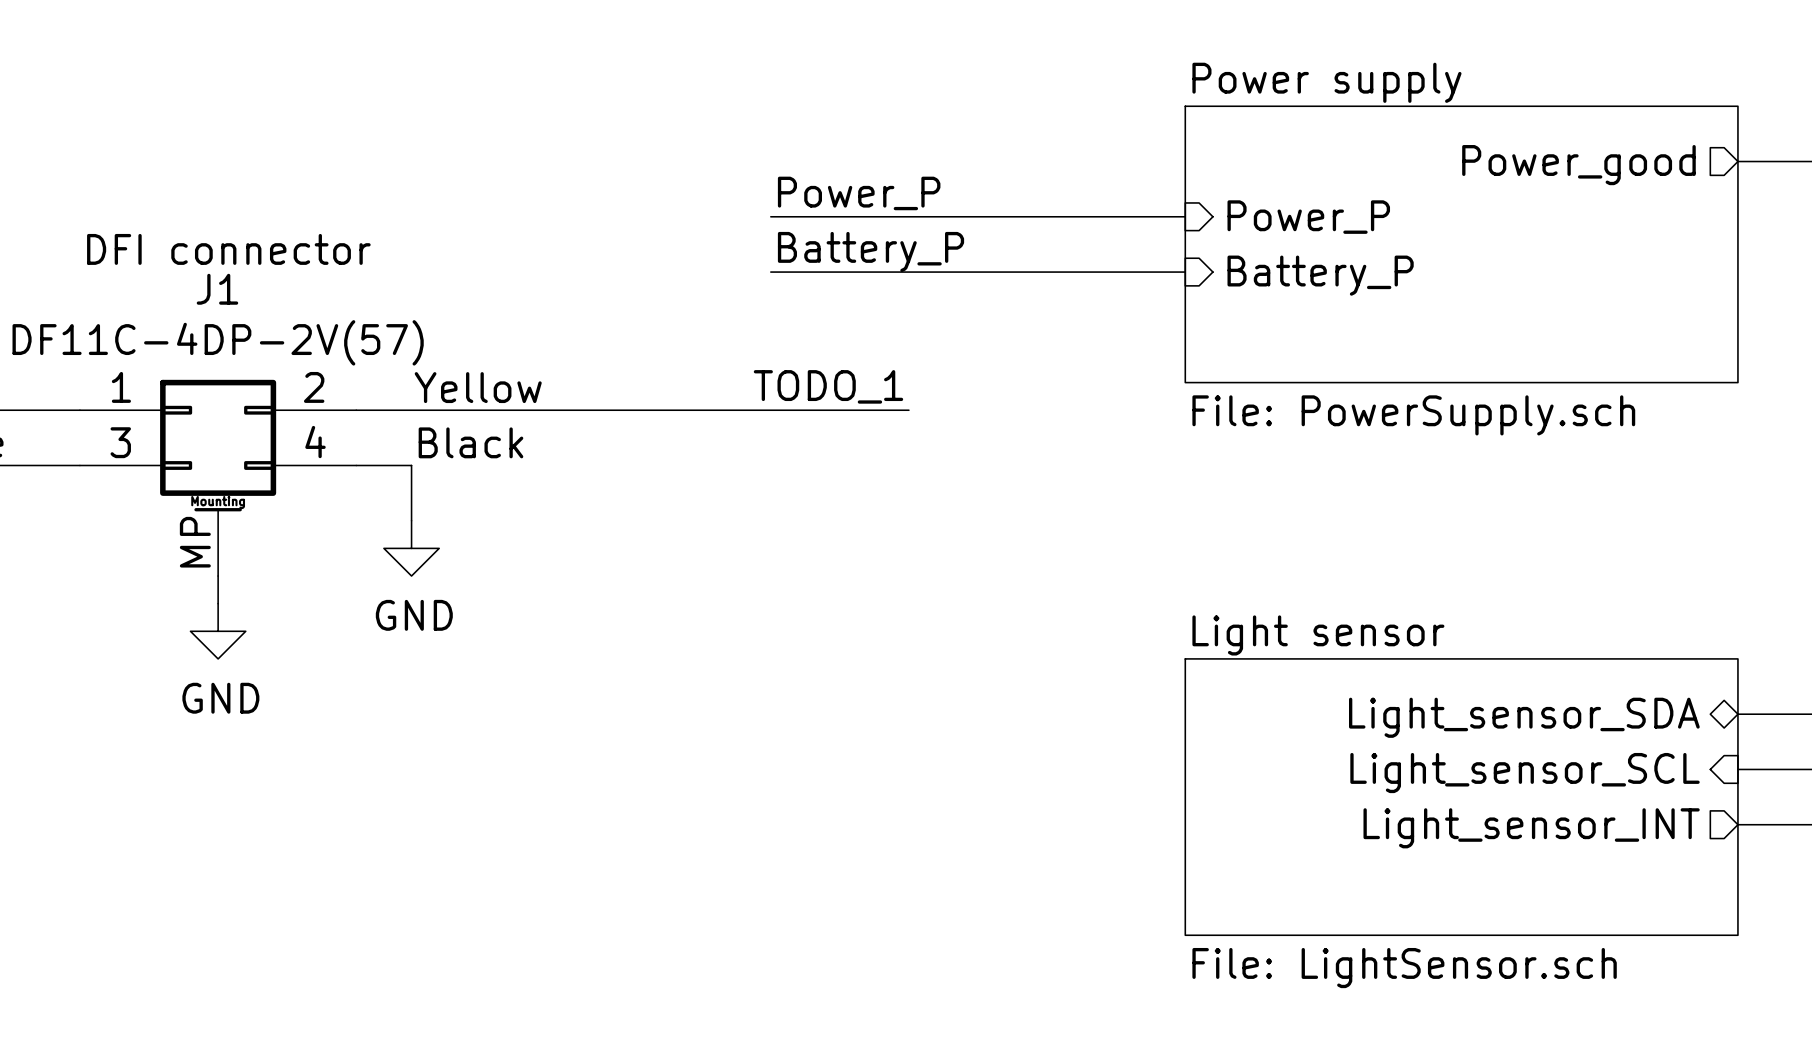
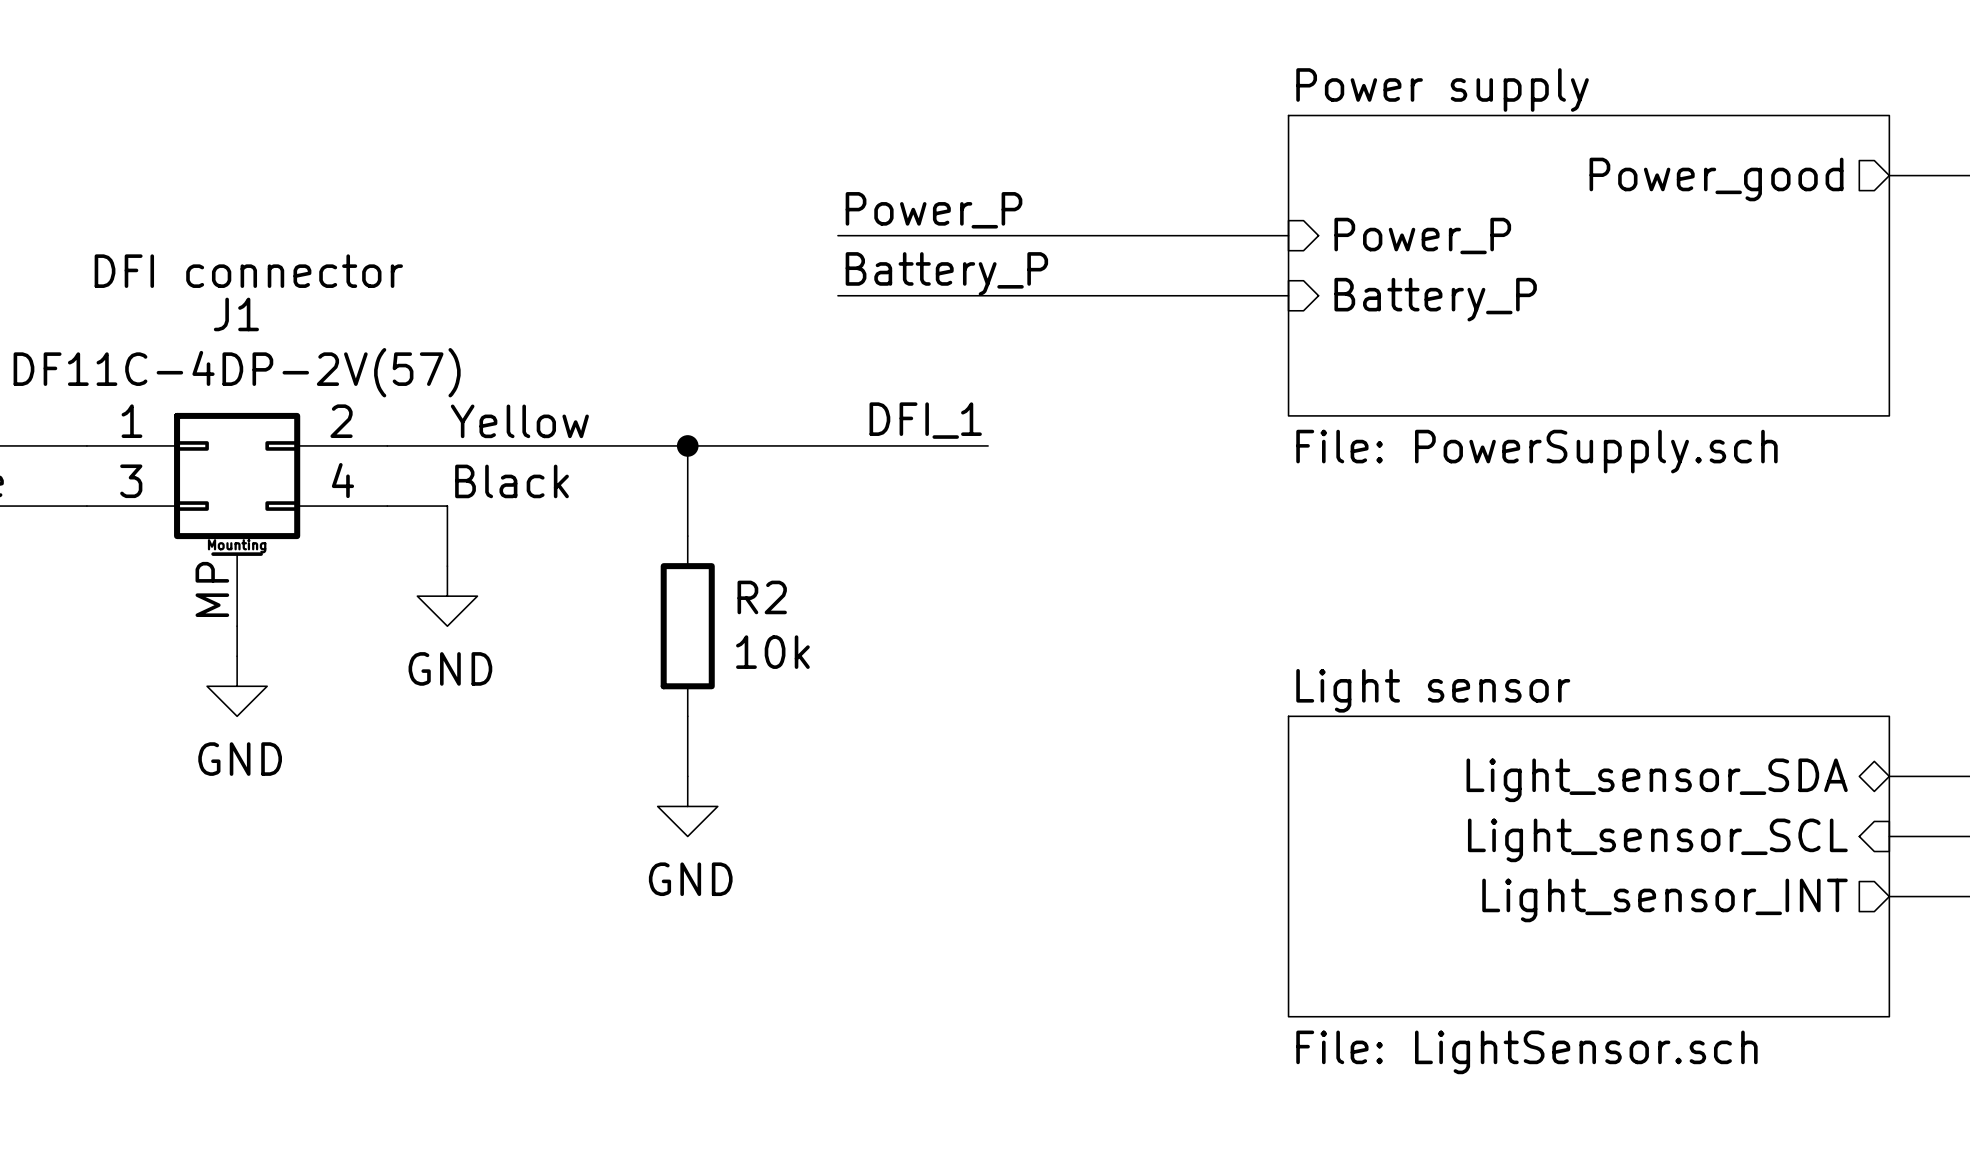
label: TODO_1 (828, 386) -> DFI_1 (925, 420)
wire: none -> (687, 445) (687, 536)
junction: none -> (687, 445)
R2: none -> 10k (687, 626)
wire: none -> (687, 716) (687, 776)
power symbol: none -> GND (687, 806)

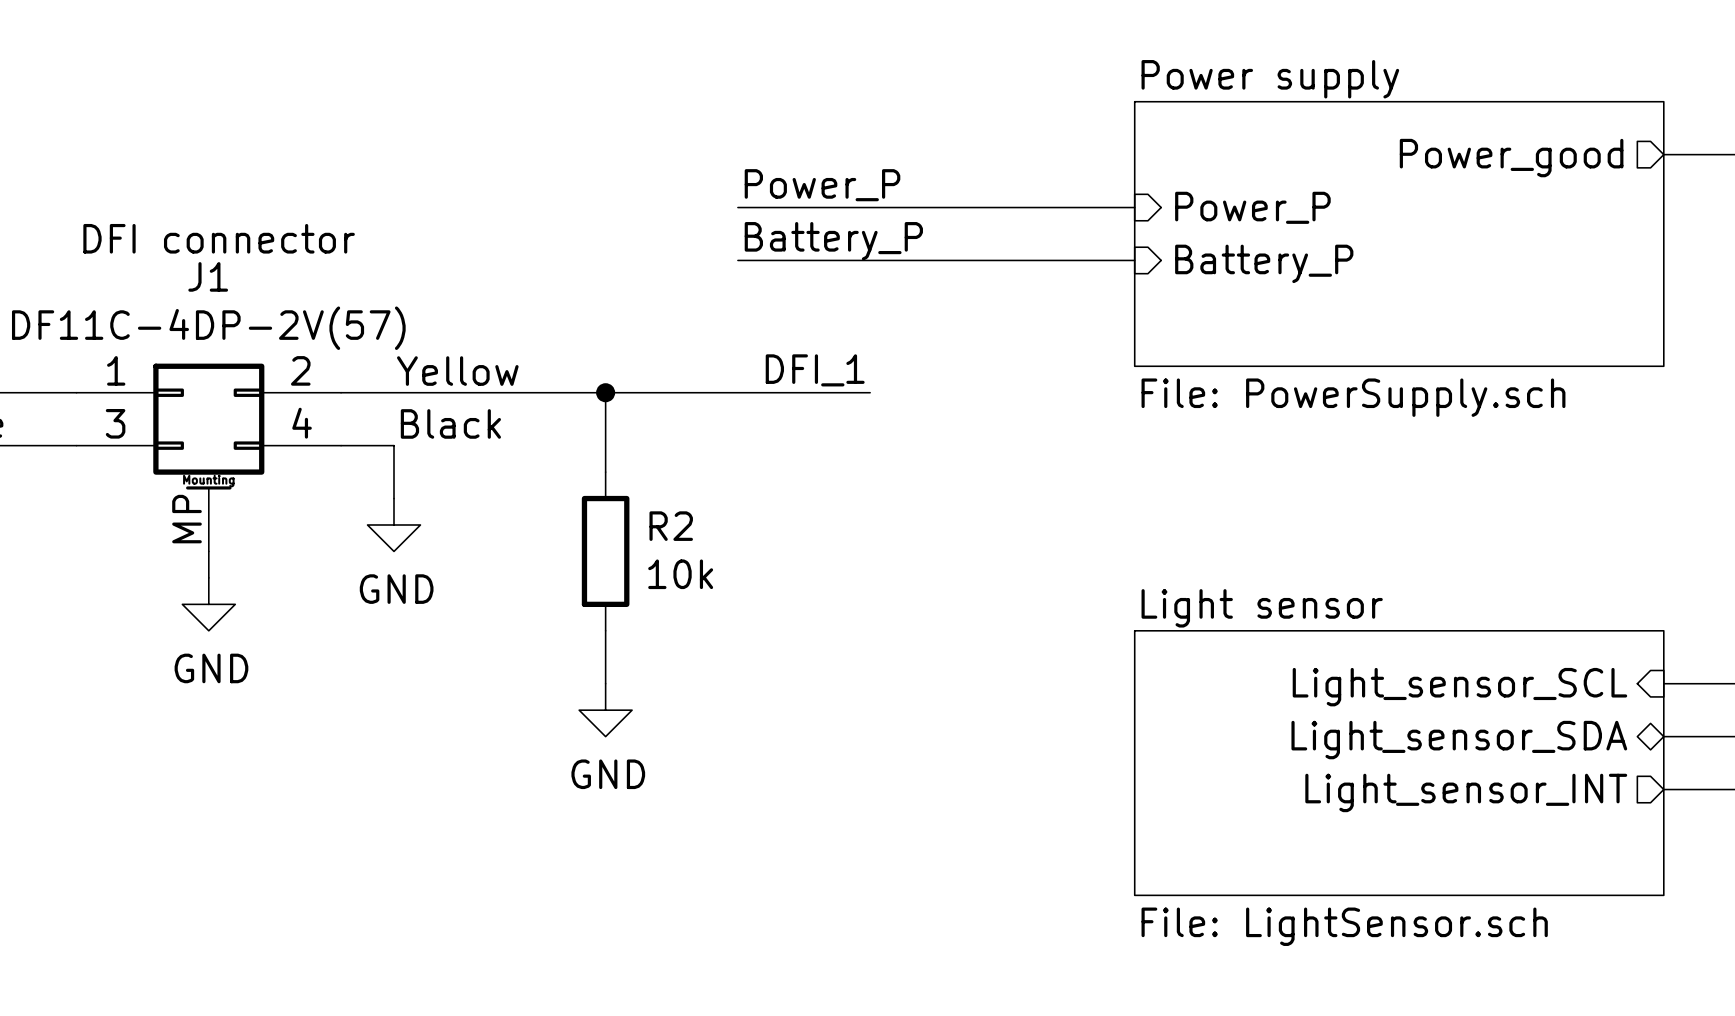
sheet pin shape: bidirectional (1657, 780) -> input (1459, 687)
sheet pin: Light_sensor_SDA (1657, 780) -> Light_sensor_SCL (1459, 687)
sheet pin shape: input (1657, 840) -> bidirectional (1459, 740)
sheet pin: Light_sensor_SCL (1657, 840) -> Light_sensor_SDA (1459, 740)

